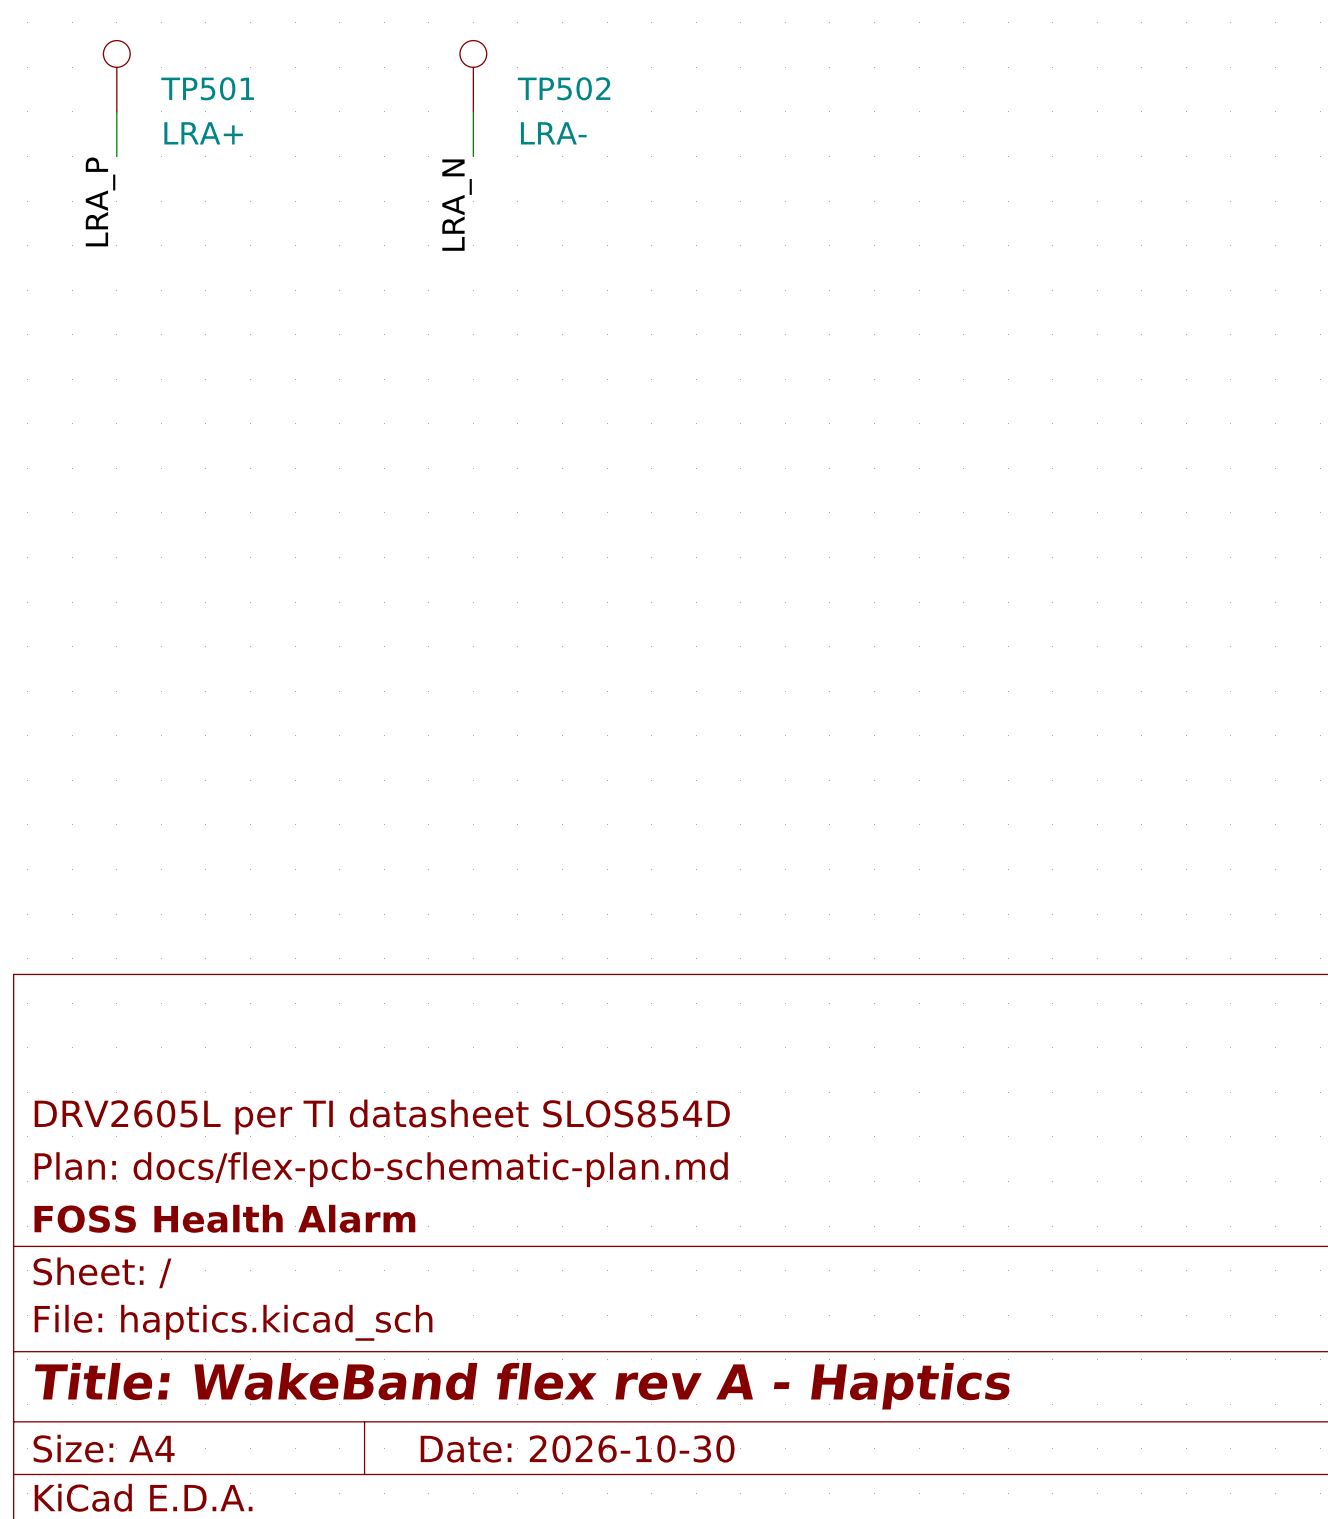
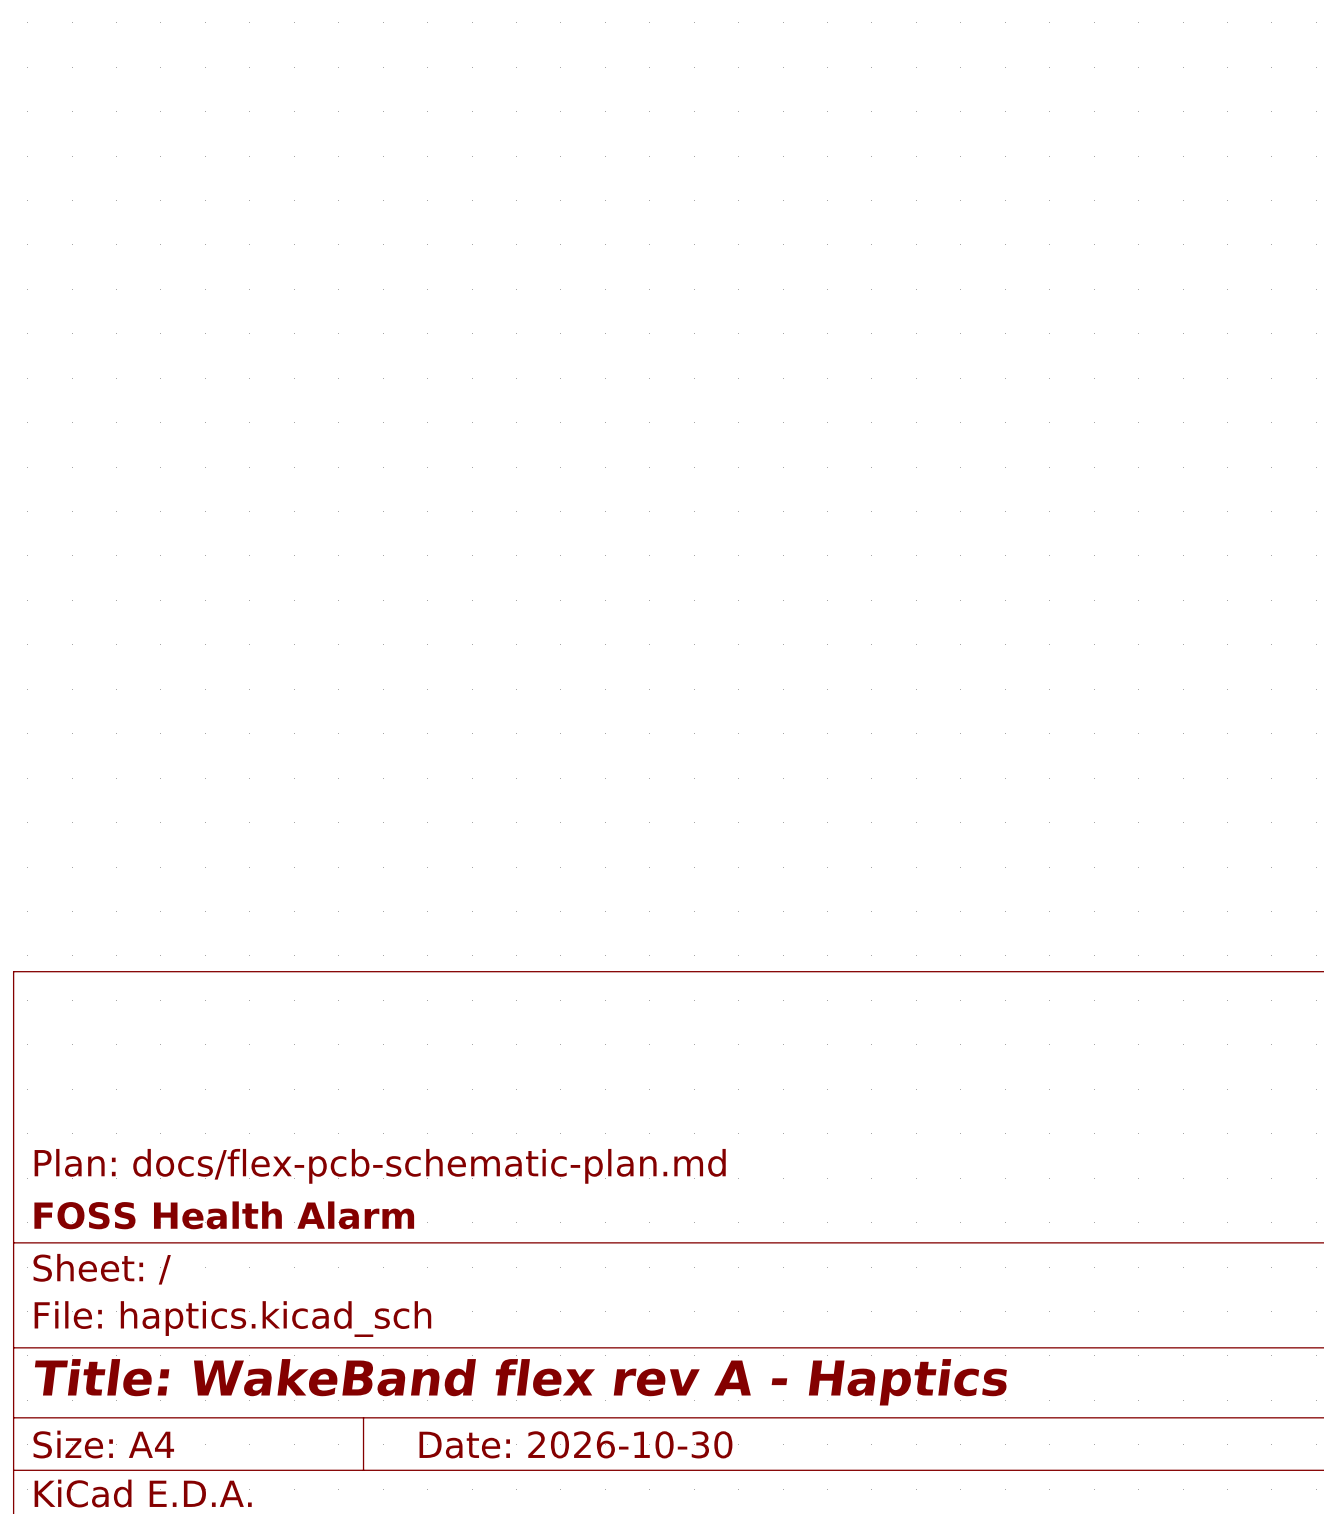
TP501: LRA+ (116, 76) -> none
TP502: LRA- (473, 76) -> none
wire: (116, 111) (116, 156) -> none
wire: (473, 111) (473, 156) -> none
label: LRA_P (100, 201) -> none
label: LRA_N (457, 205) -> none
title block: DRV2605L per TI datasheet SLOS854D (382, 1117) -> none

